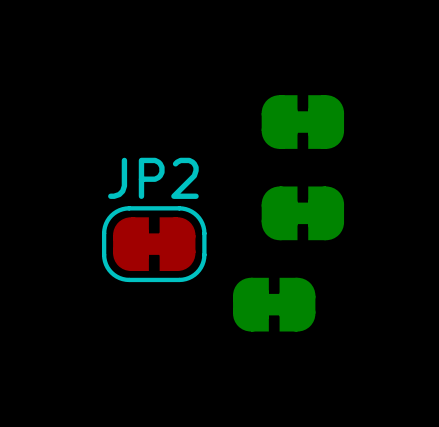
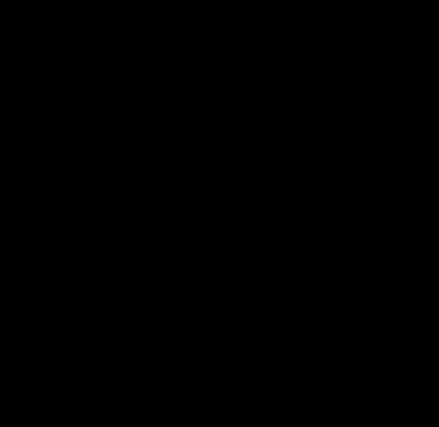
part: (302, 122) -> none
part: (302, 213) -> none
JP2: (154, 244) -> none
part: (274, 304) -> none

